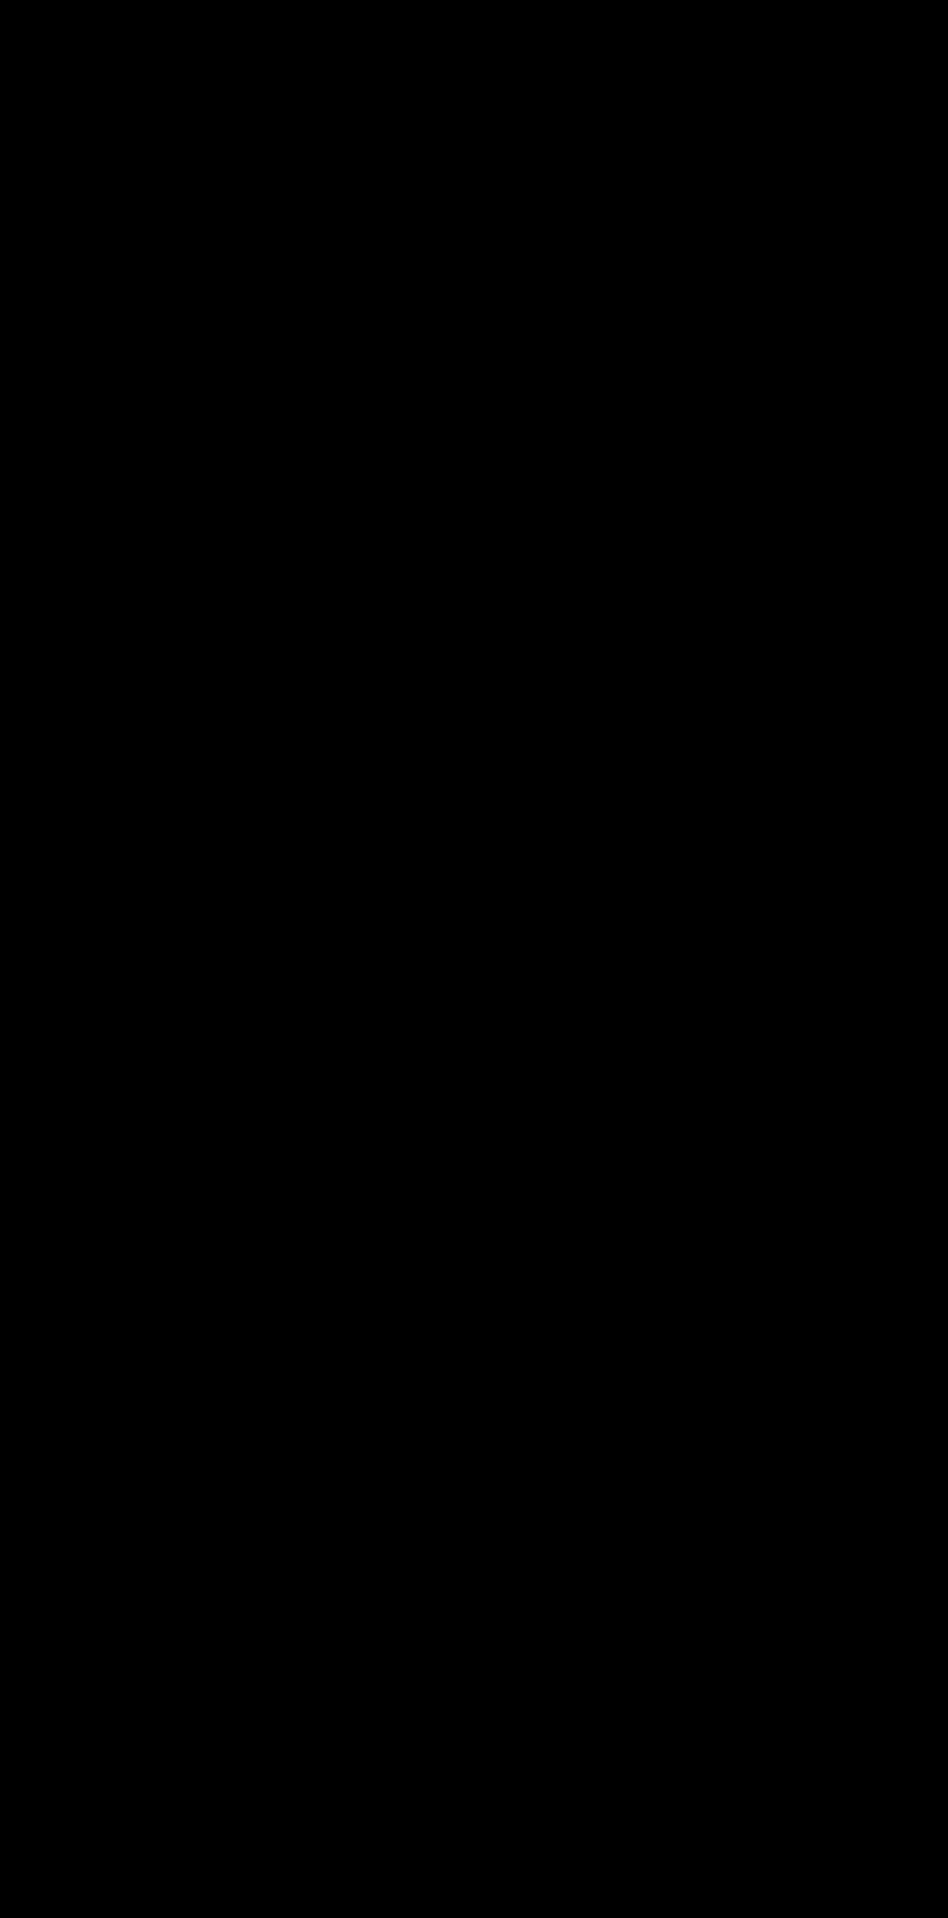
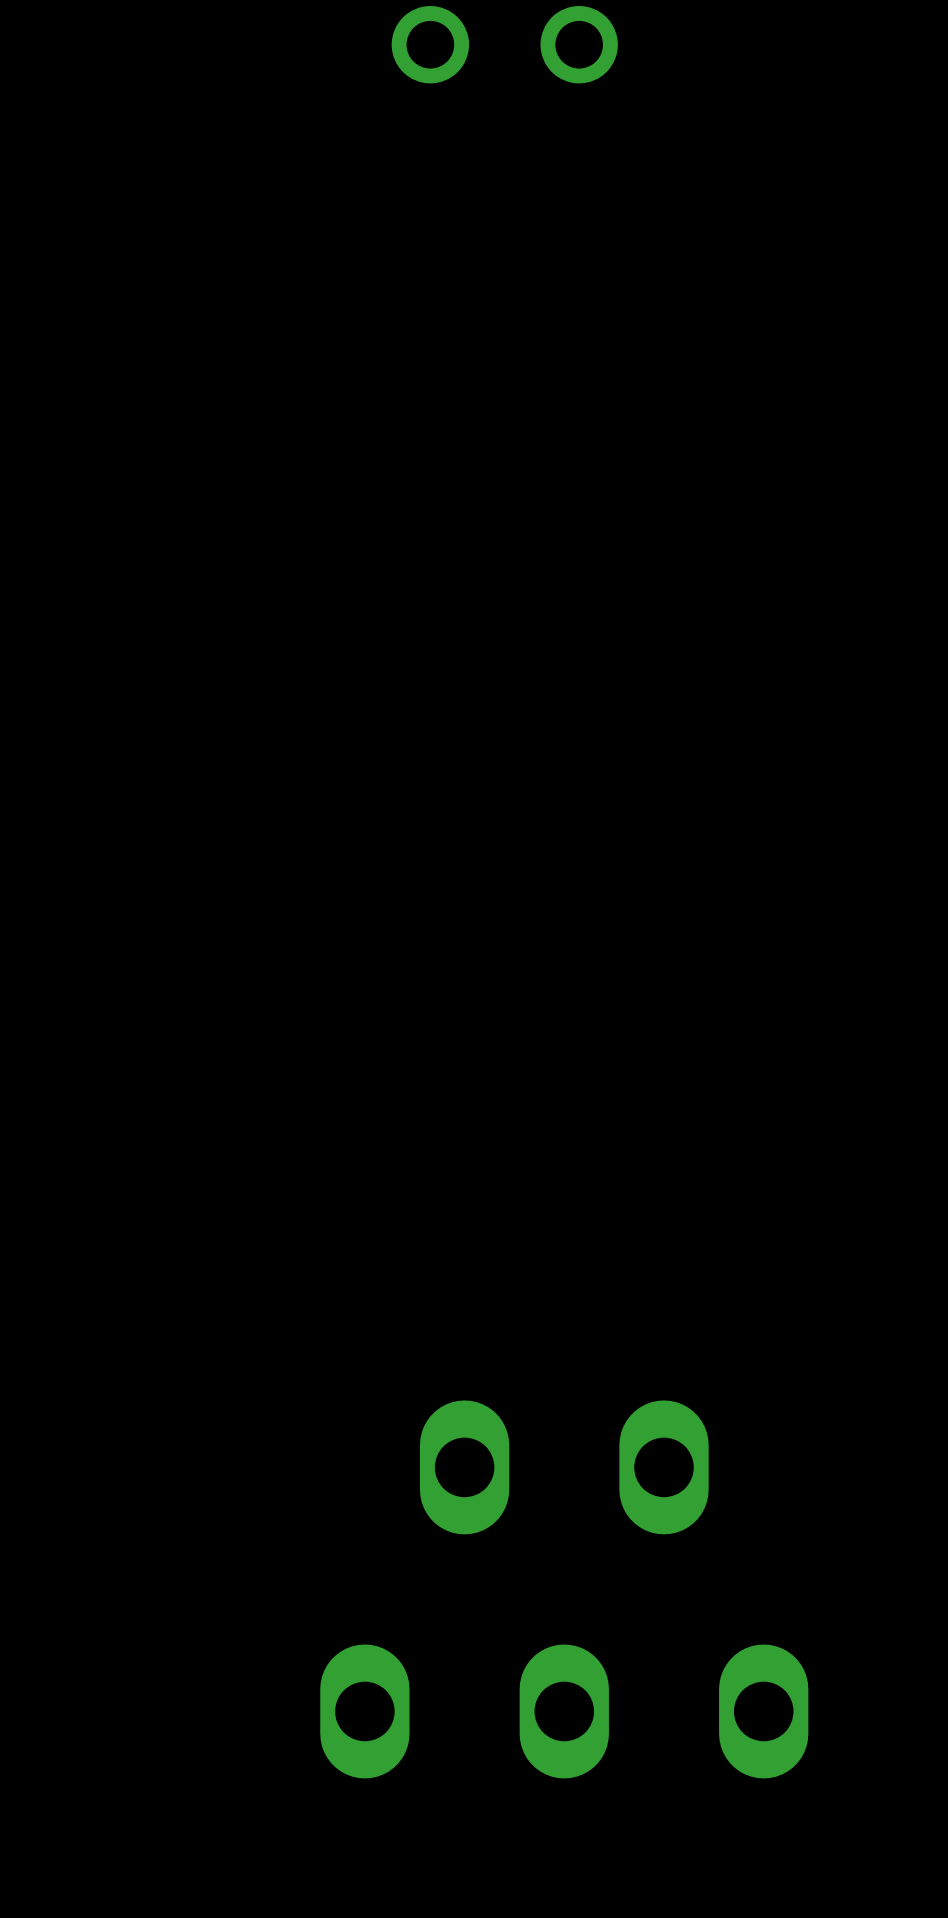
part: none -> (504, 44)
part: none -> (564, 1589)

